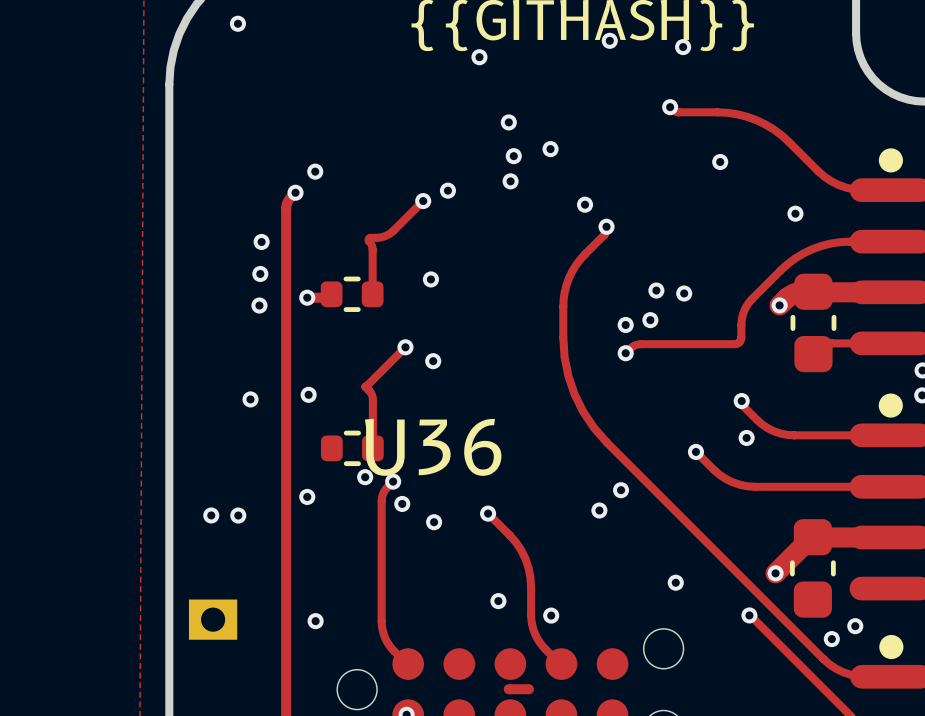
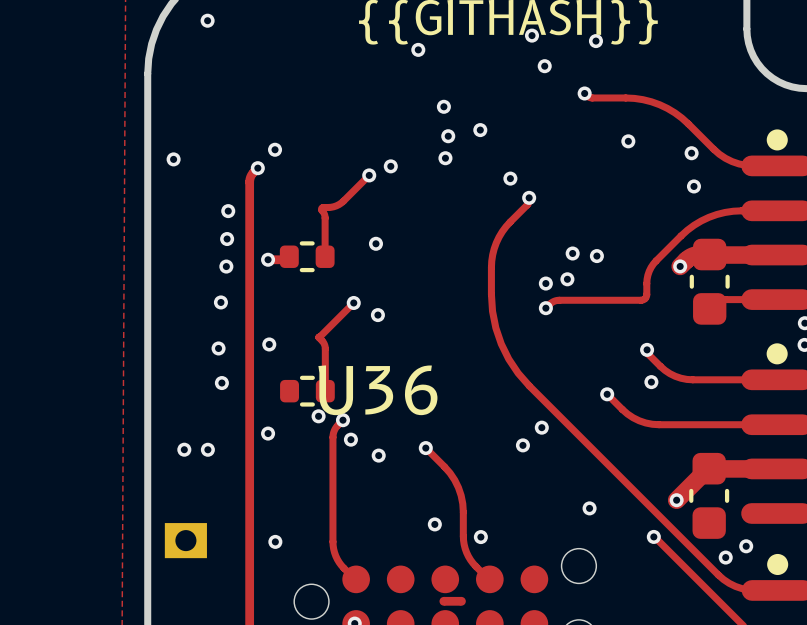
via: none -> (544, 66)
via: none -> (691, 153)
via: none -> (173, 159)
via: none -> (220, 302)
via: none -> (221, 383)

